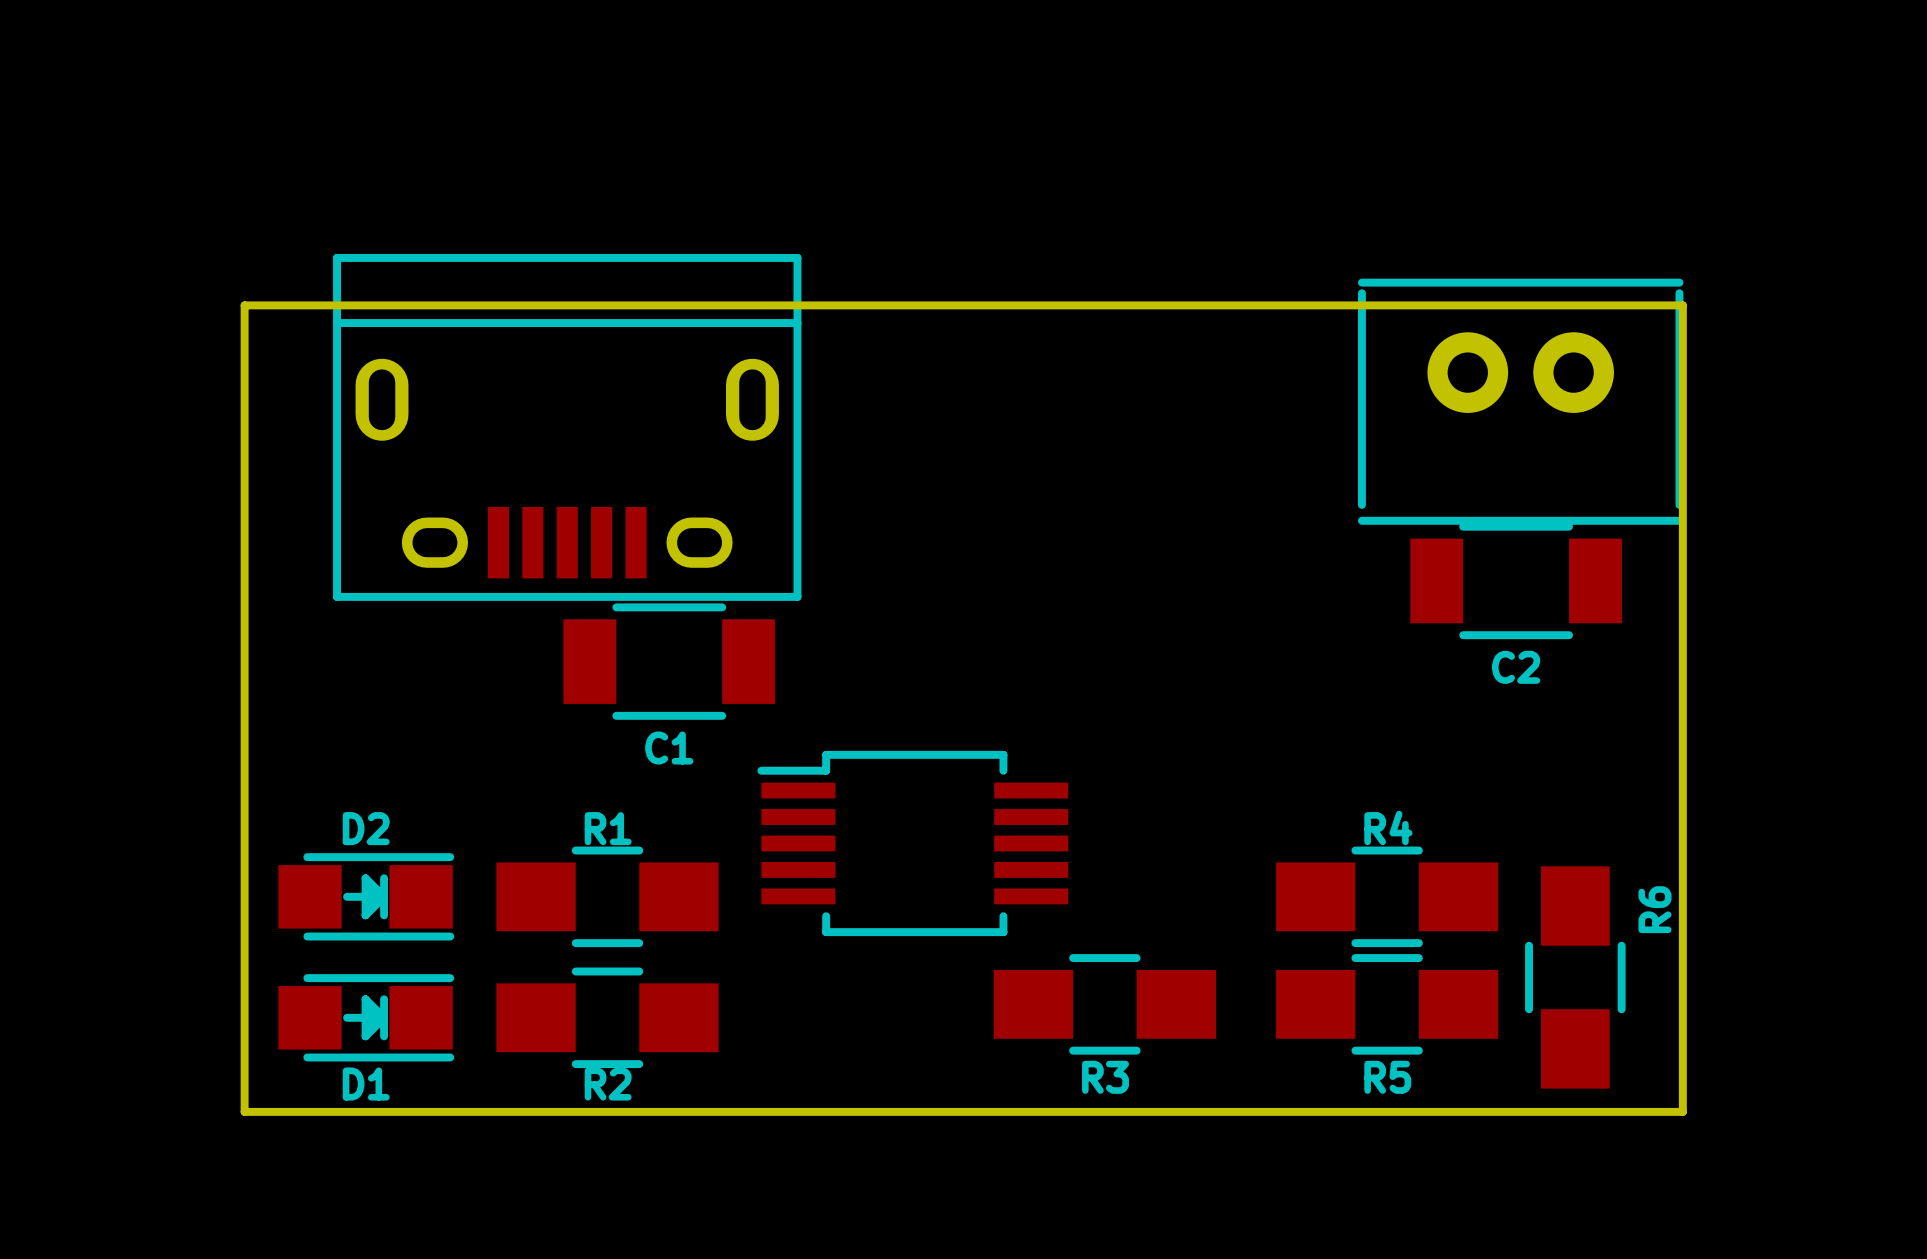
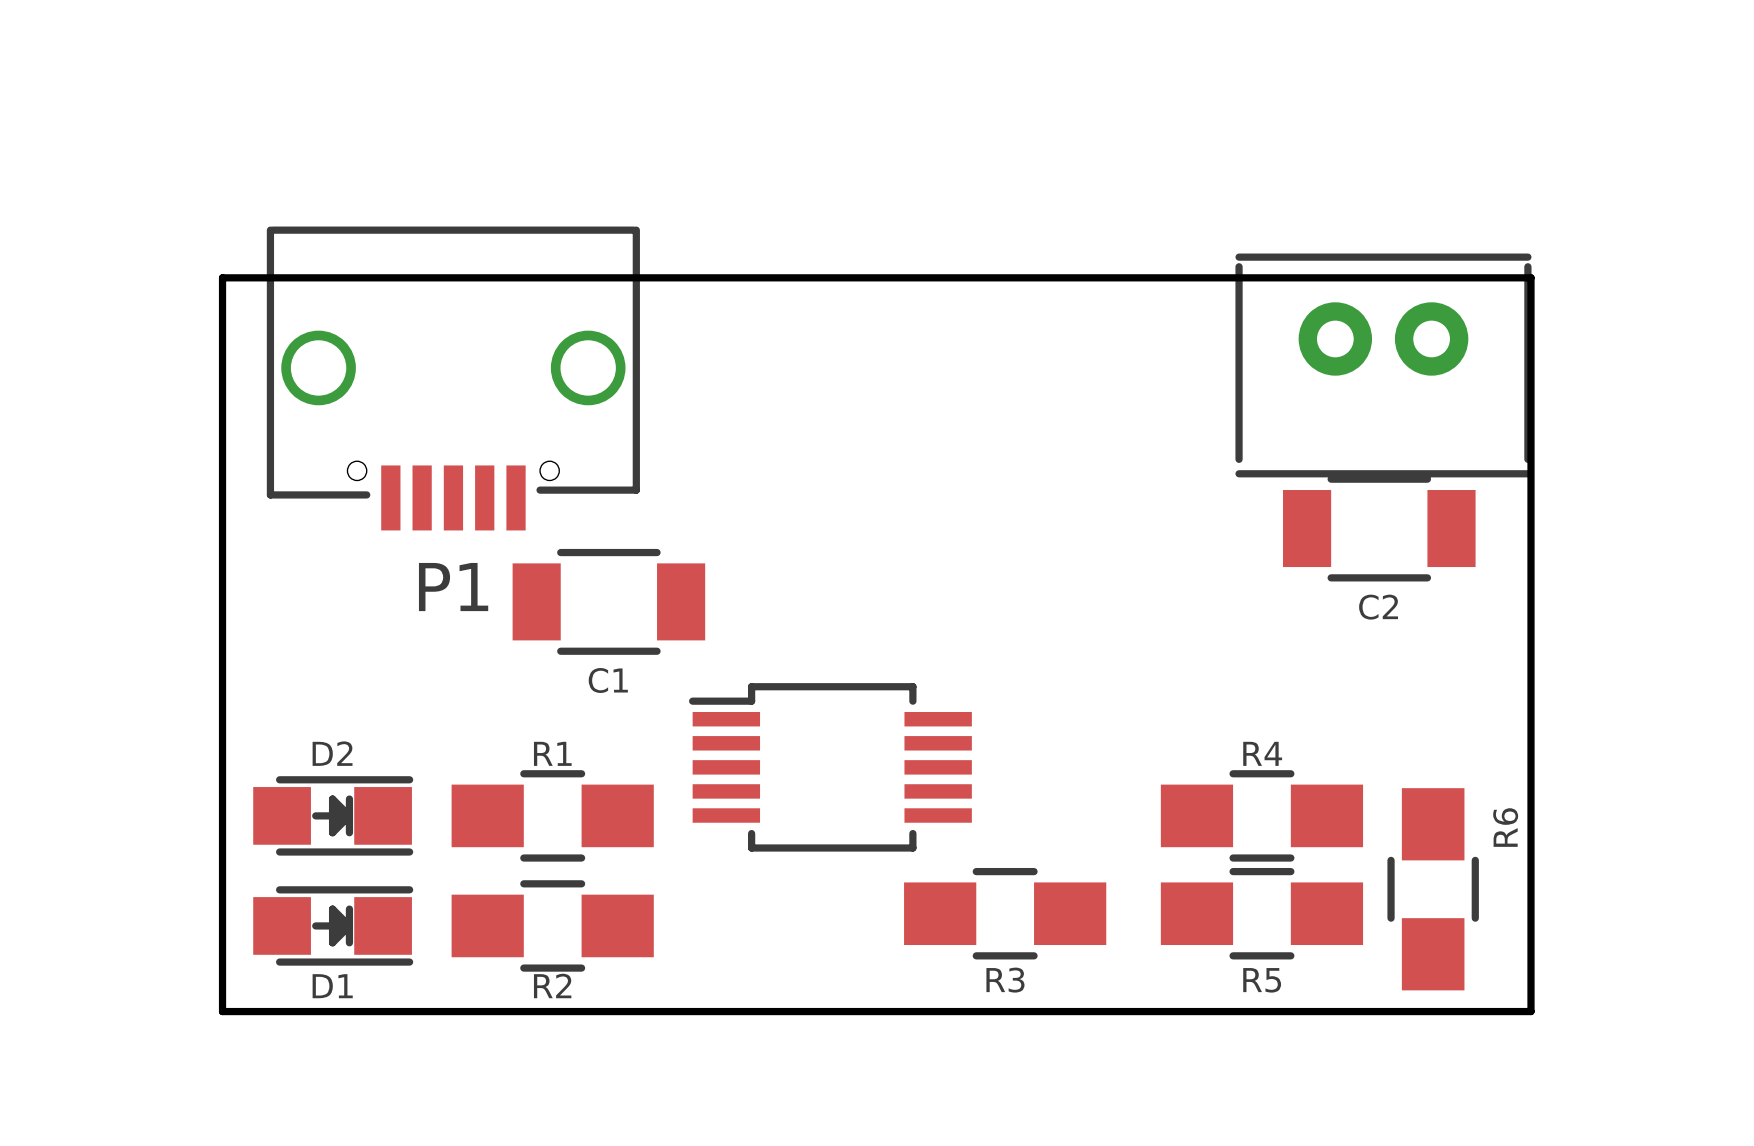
P1: none -> (453, 378)
part: (567, 427) -> none

